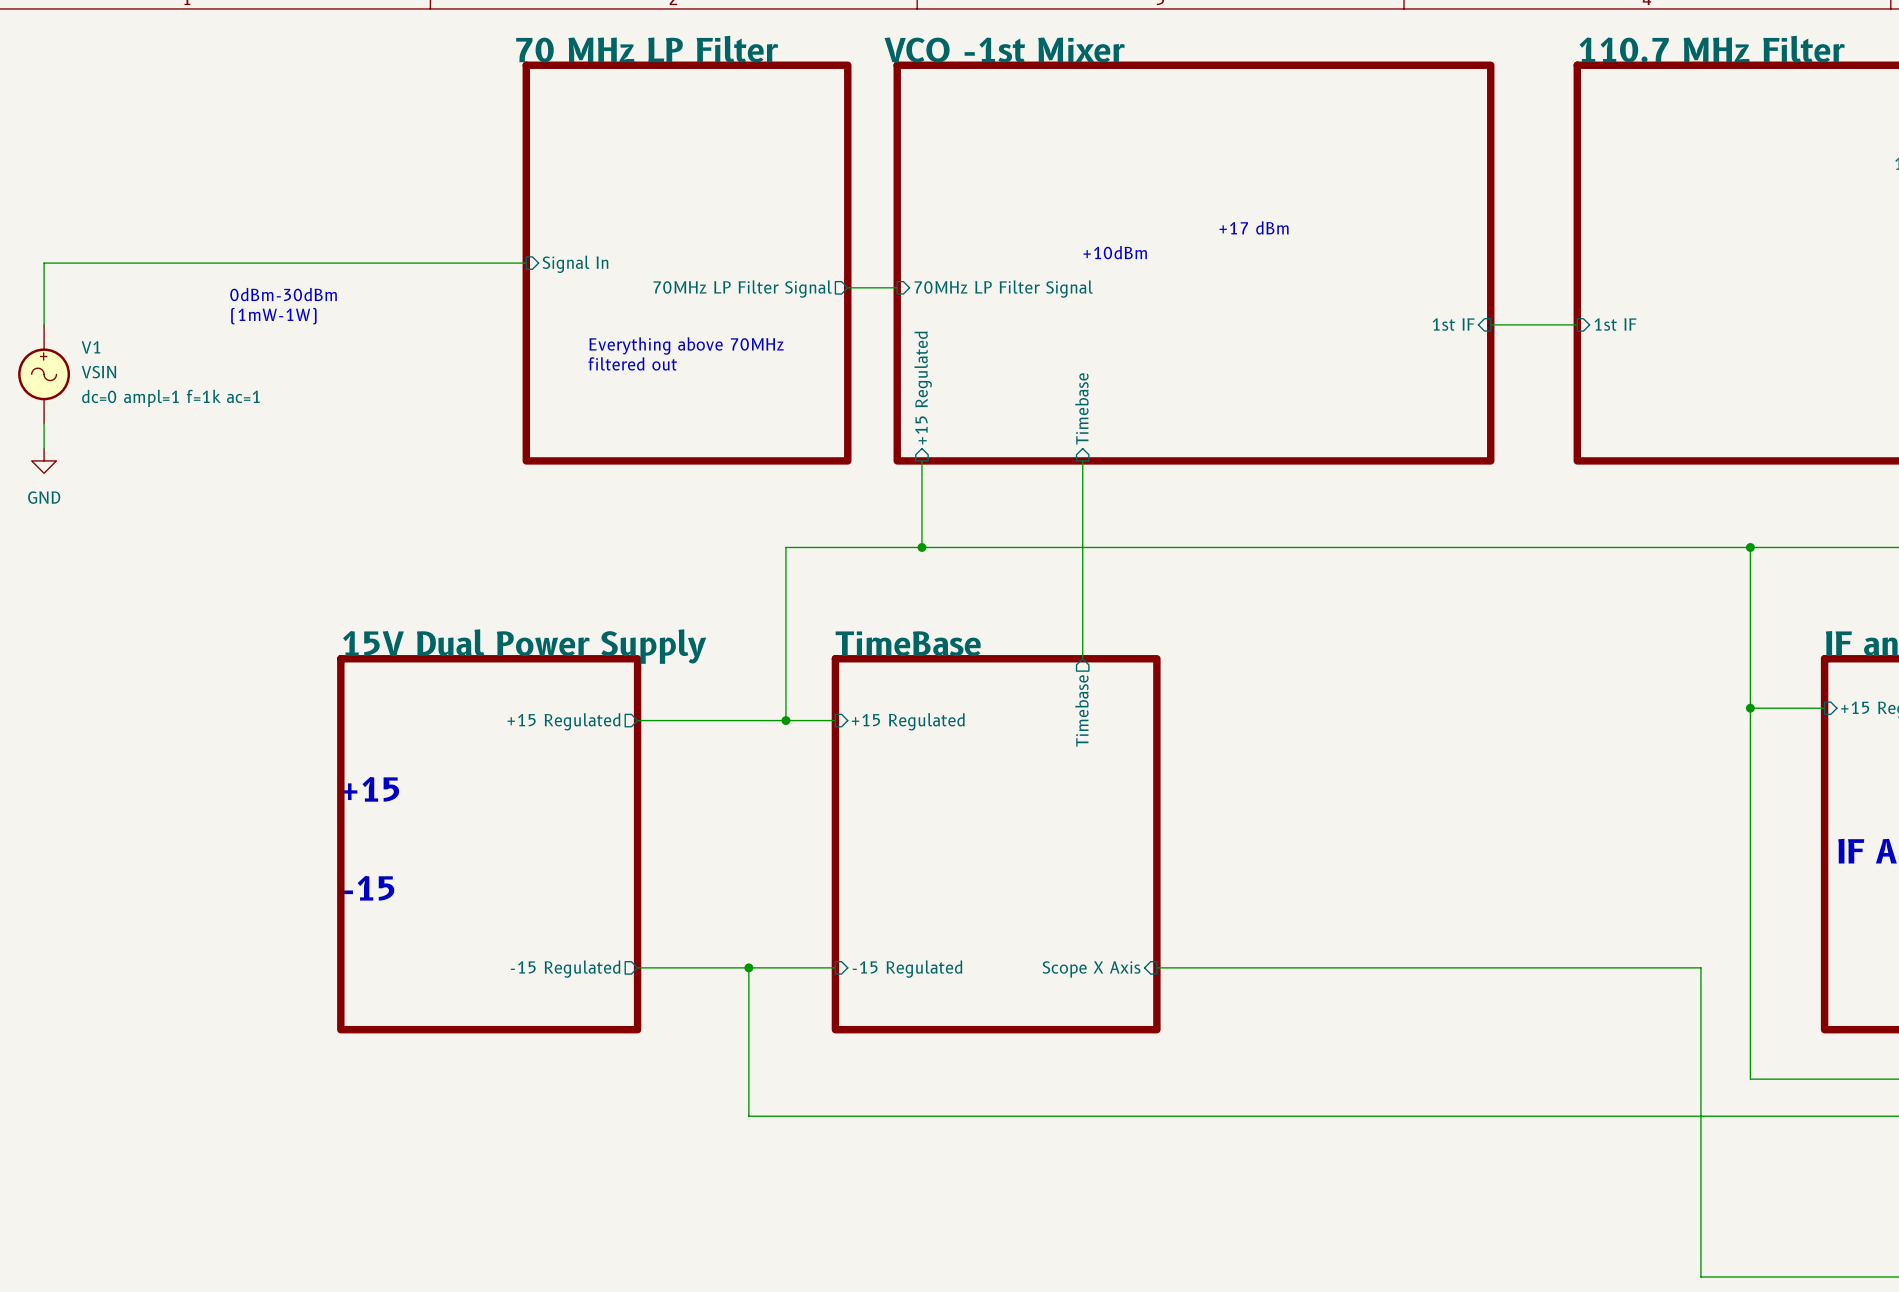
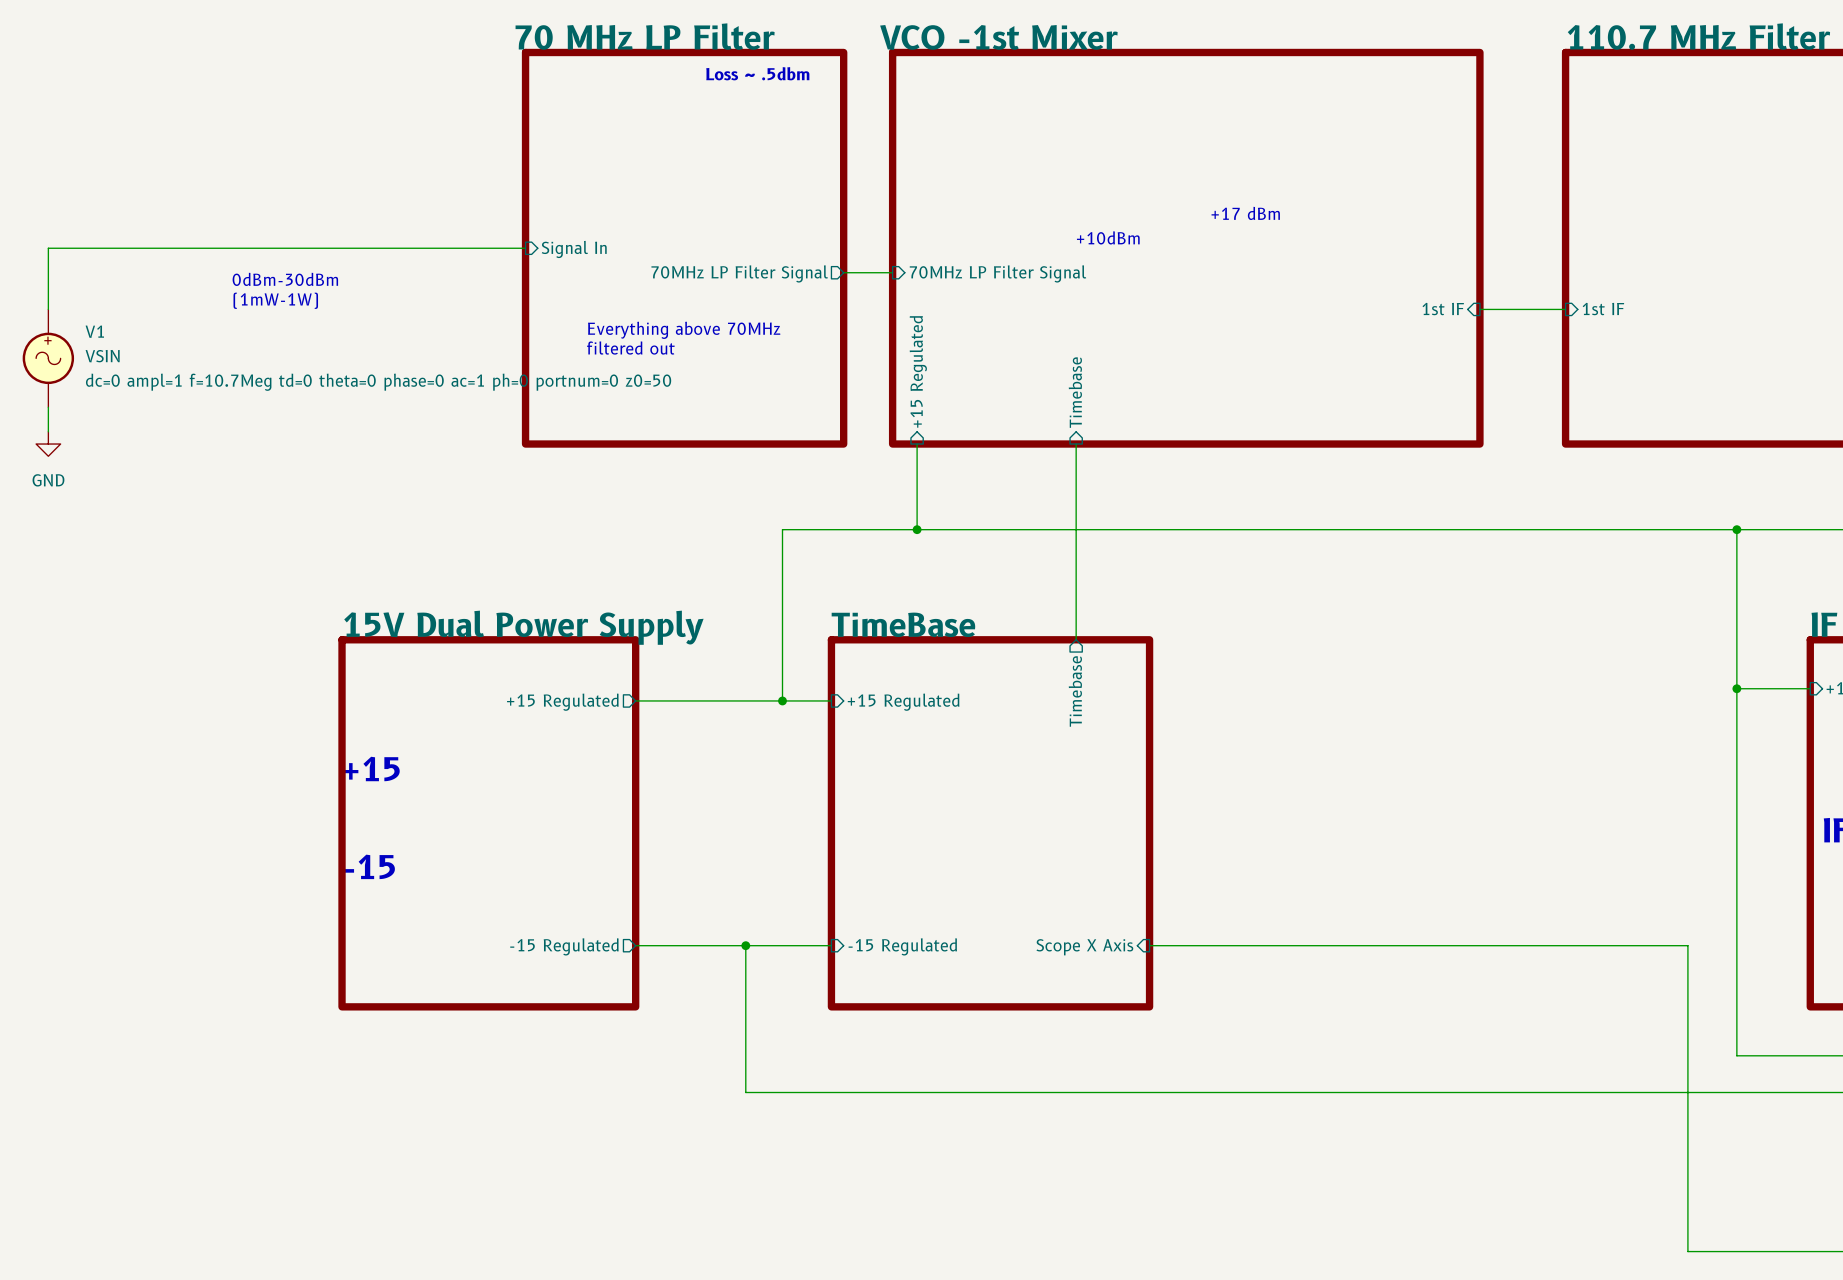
text: none -> Loss ~ .5dbm (757, 73)
V1 text: dc=0 ampl=1 f=1k ac=1 (170, 398) -> dc=0 ampl=1 f=10.7Meg td=0 theta=0 phase=0 ac=1 ph=0 portnum=0 z0=50 (378, 382)

